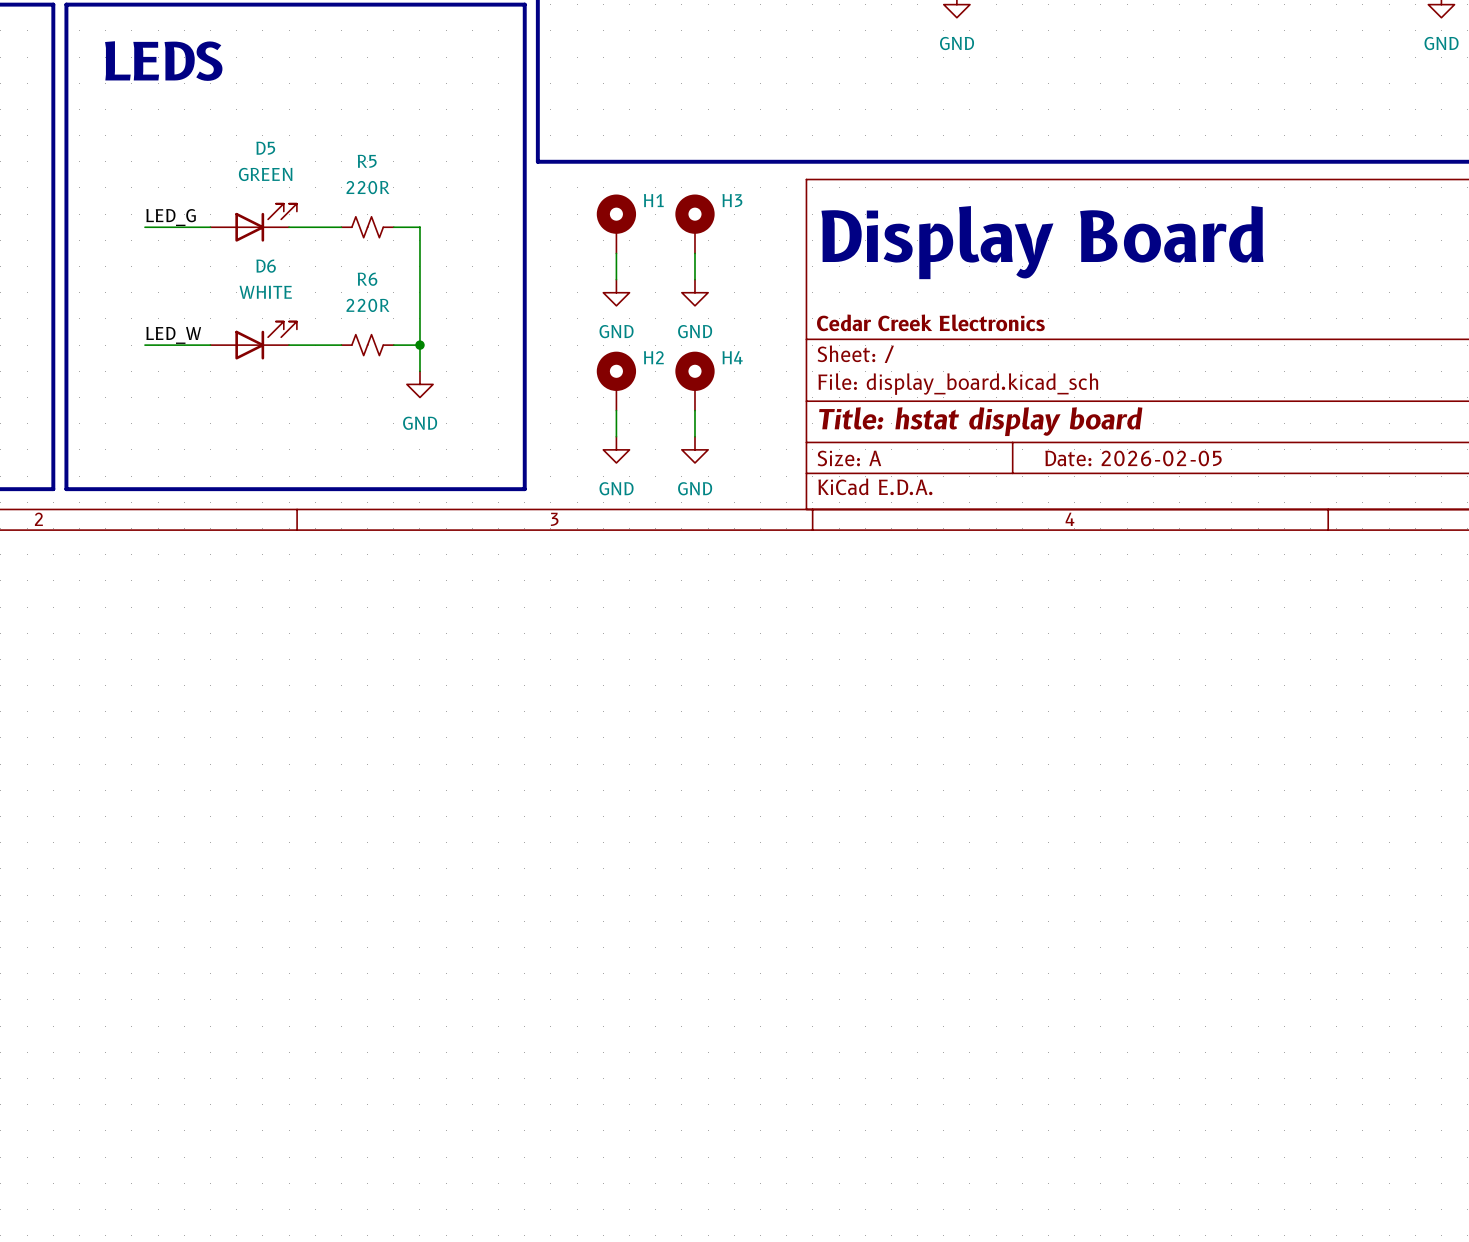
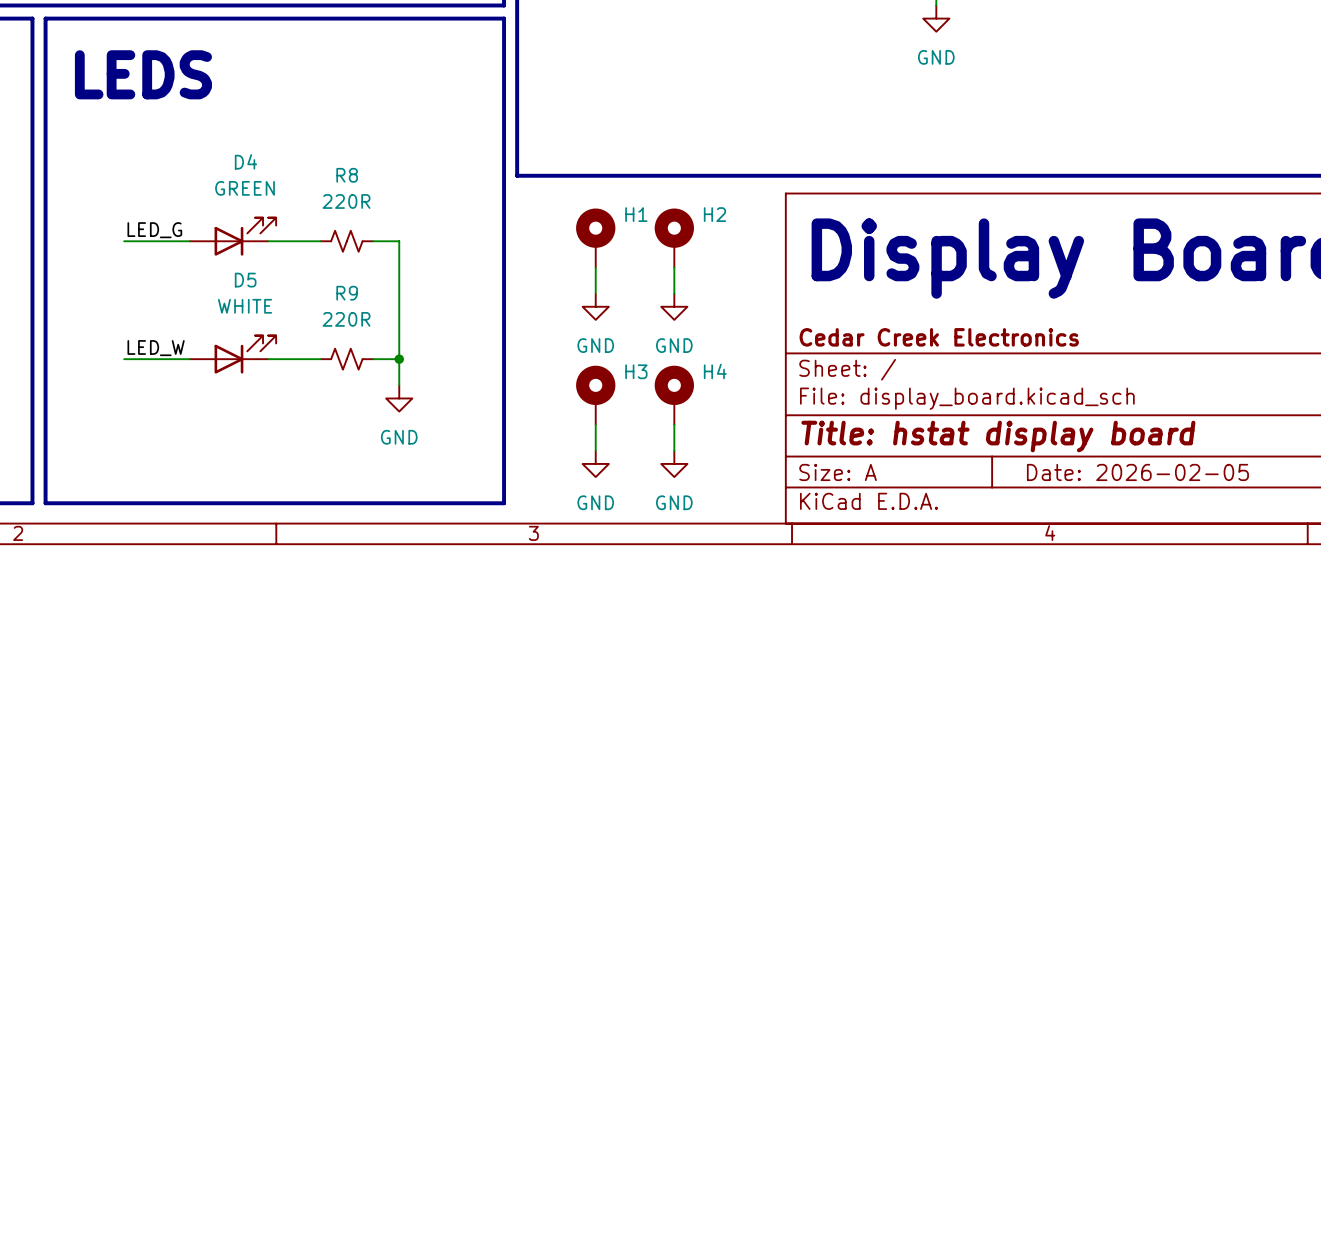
D5 name: D5 (265, 148) -> D4 (245, 161)
R5 name: R5 (367, 161) -> R8 (347, 175)
H3 name: H3 (732, 200) -> H2 (714, 214)
D6 name: D6 (266, 266) -> D5 (245, 280)
R6 name: R6 (367, 279) -> R9 (347, 293)
H2 name: H2 (653, 357) -> H3 (636, 371)

